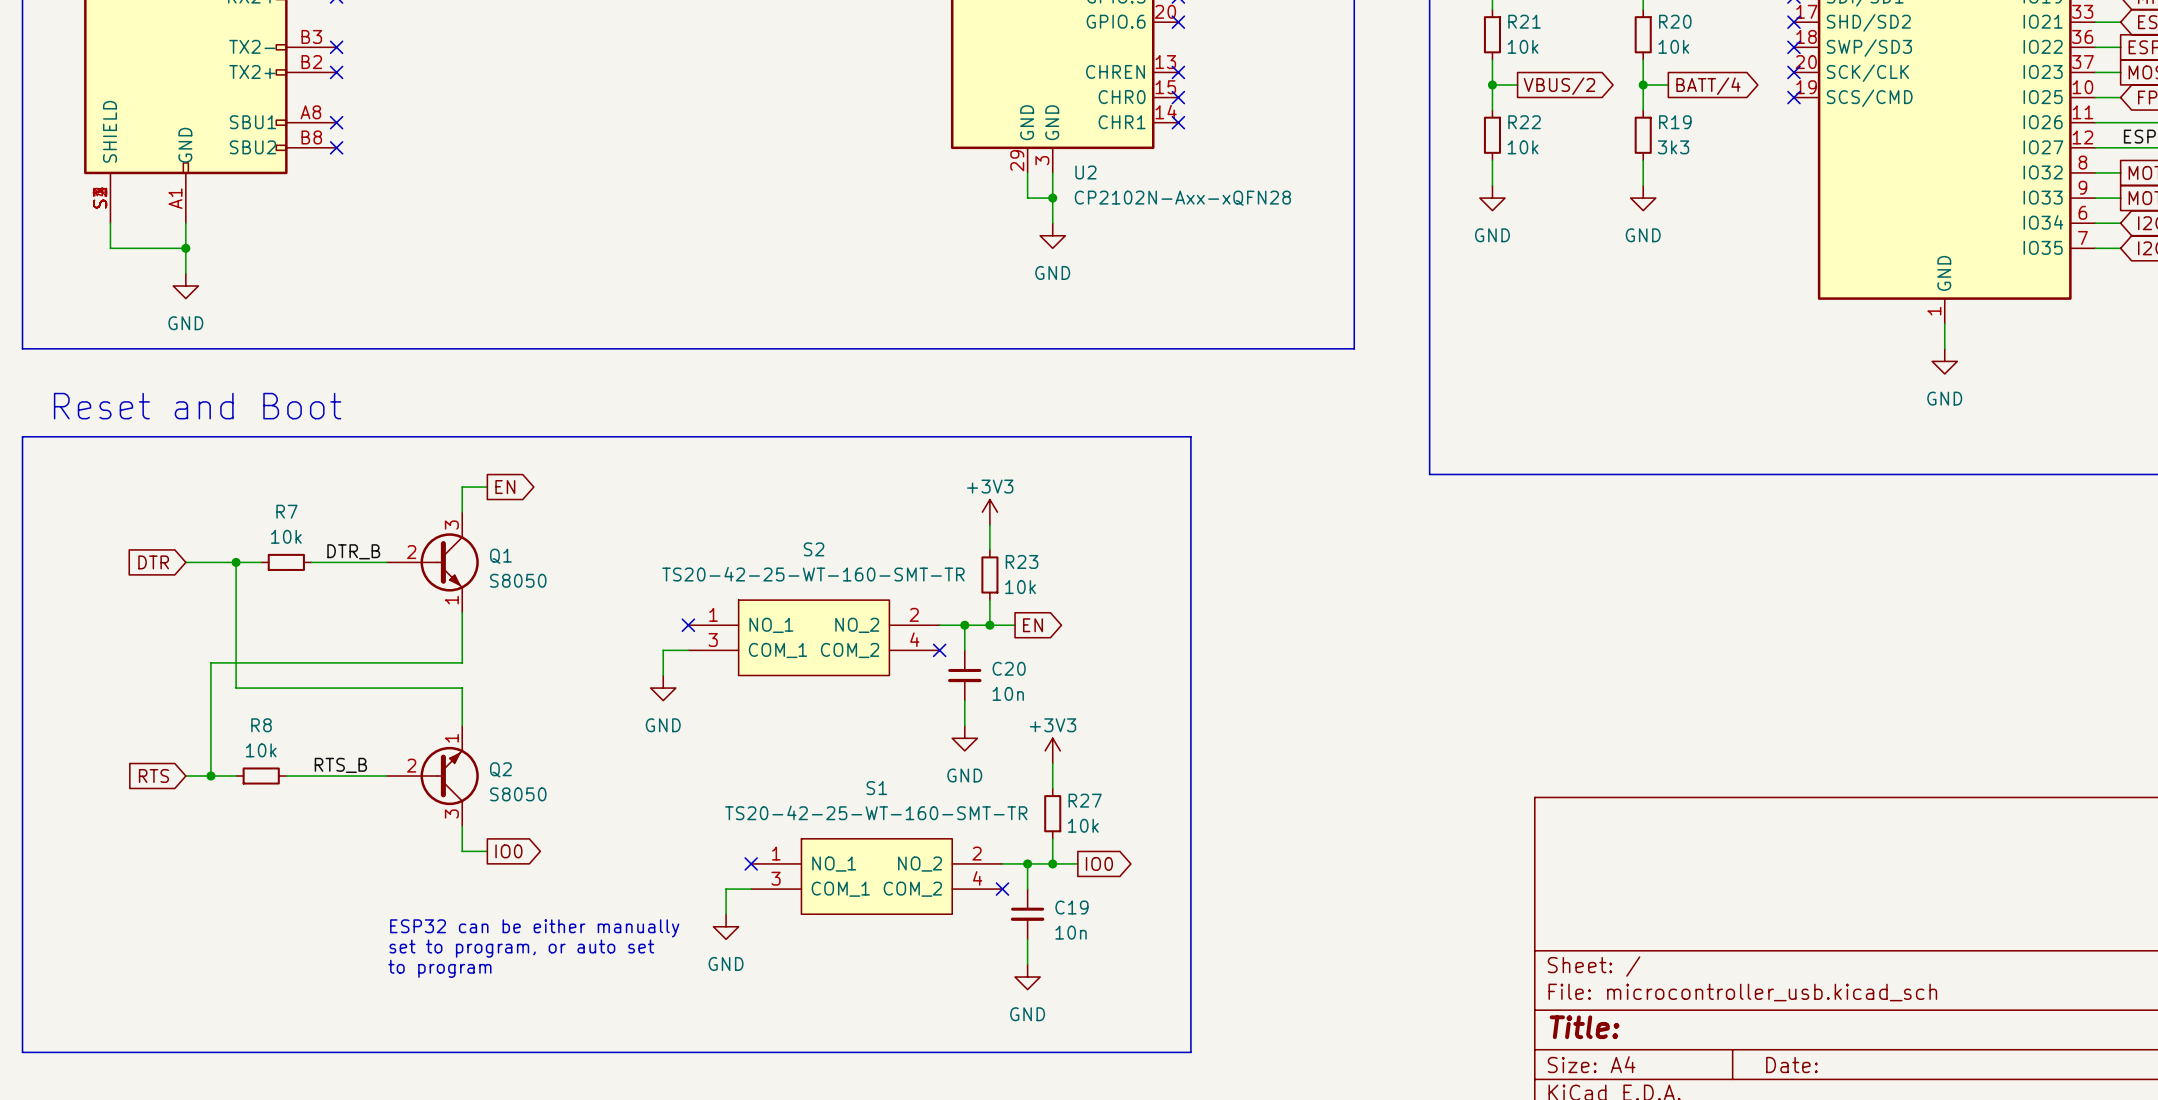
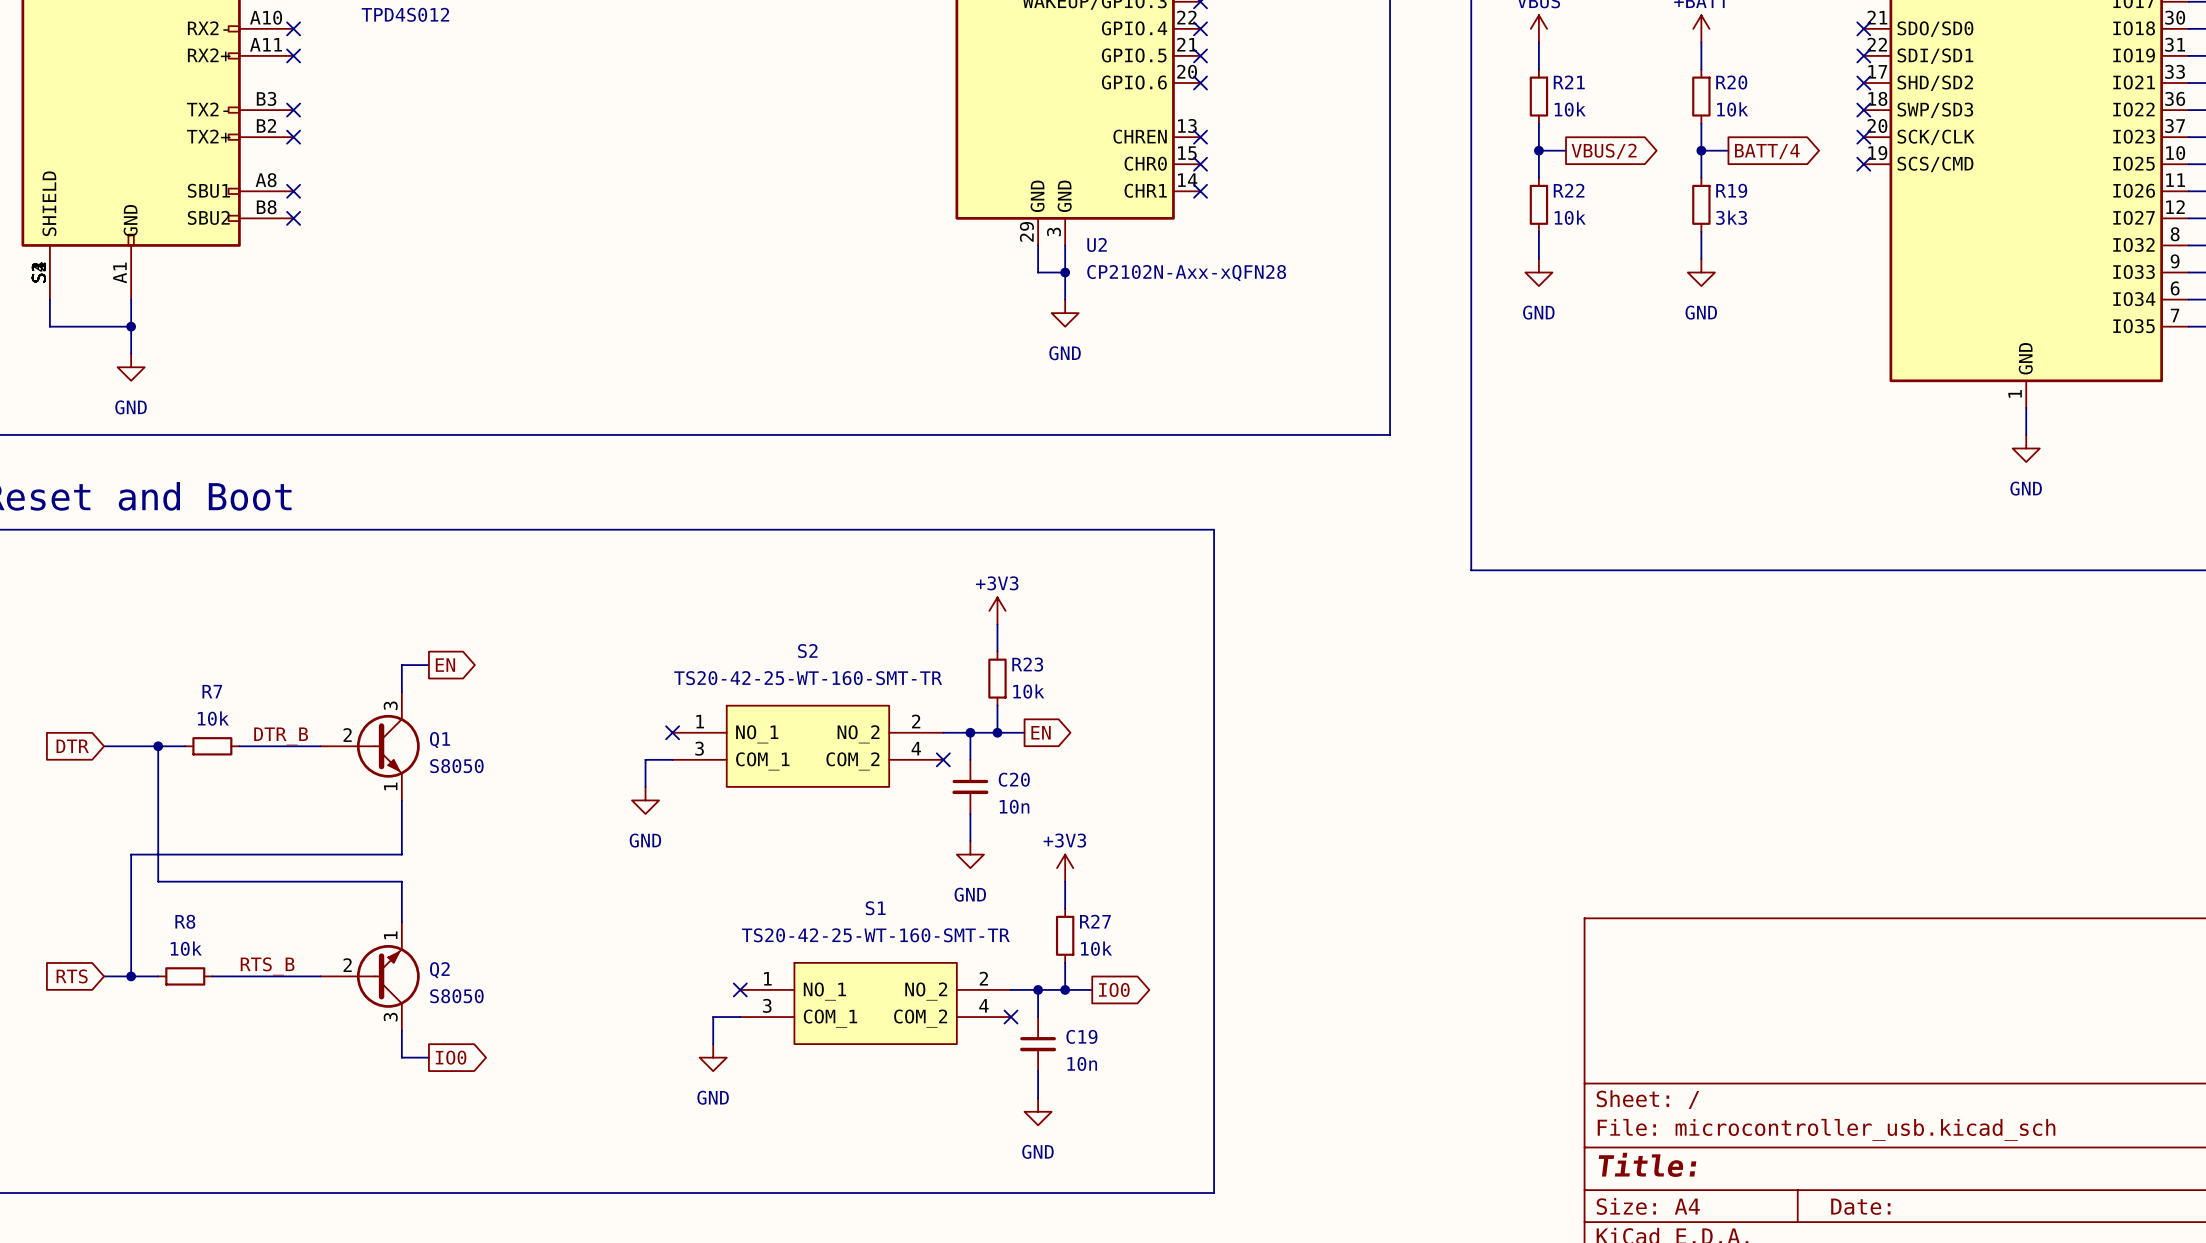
wire: (487, 487) (462, 487) (462, 512) -> (428, 665) (401, 665) (401, 692)
global label position: EN (505, 487) -> EN (445, 665)
label position: DTR_B (353, 551) -> DTR_B (281, 736)
global label position: DTR (153, 562) -> DTR (72, 746)
wire: (185, 562) (261, 562) -> (104, 746) (185, 746)
wire: (236, 562) (236, 688) (462, 688) (462, 725) -> none
junction: (236, 562) -> none
R7 position: (286, 562) -> (212, 746)
wire: (311, 562) (386, 562) -> (239, 746) (320, 746)
Q1 position: (432, 562) -> (370, 746)
wire: (462, 612) (462, 662) (210, 662) -> (158, 746) (158, 773)
junction: none -> (158, 746)
wire: none -> (401, 800) (401, 854) (131, 854) (131, 976)
wire: (210, 763) (210, 776) -> (158, 881) (401, 881) (401, 922)
label position: RTS_B (340, 765) -> RTS_B (267, 966)
global label position: RTS (153, 776) -> RTS (72, 976)
wire: (185, 776) (236, 776) -> (104, 976) (158, 976)
junction: (210, 776) -> none
R8 position: (261, 776) -> (185, 976)
wire: (286, 776) (386, 776) -> (212, 976) (320, 976)
Q2 position: (432, 776) -> (370, 976)
wire: (462, 826) (462, 851) (487, 851) -> (401, 1030) (401, 1057) (428, 1057)
junction: none -> (131, 976)
global label position: IO0 (508, 851) -> IO0 (451, 1057)
text: ESP32 can be either manually (534, 928) -> none
text: set to program, or auto set (521, 948) -> none
text: to program (439, 968) -> none

